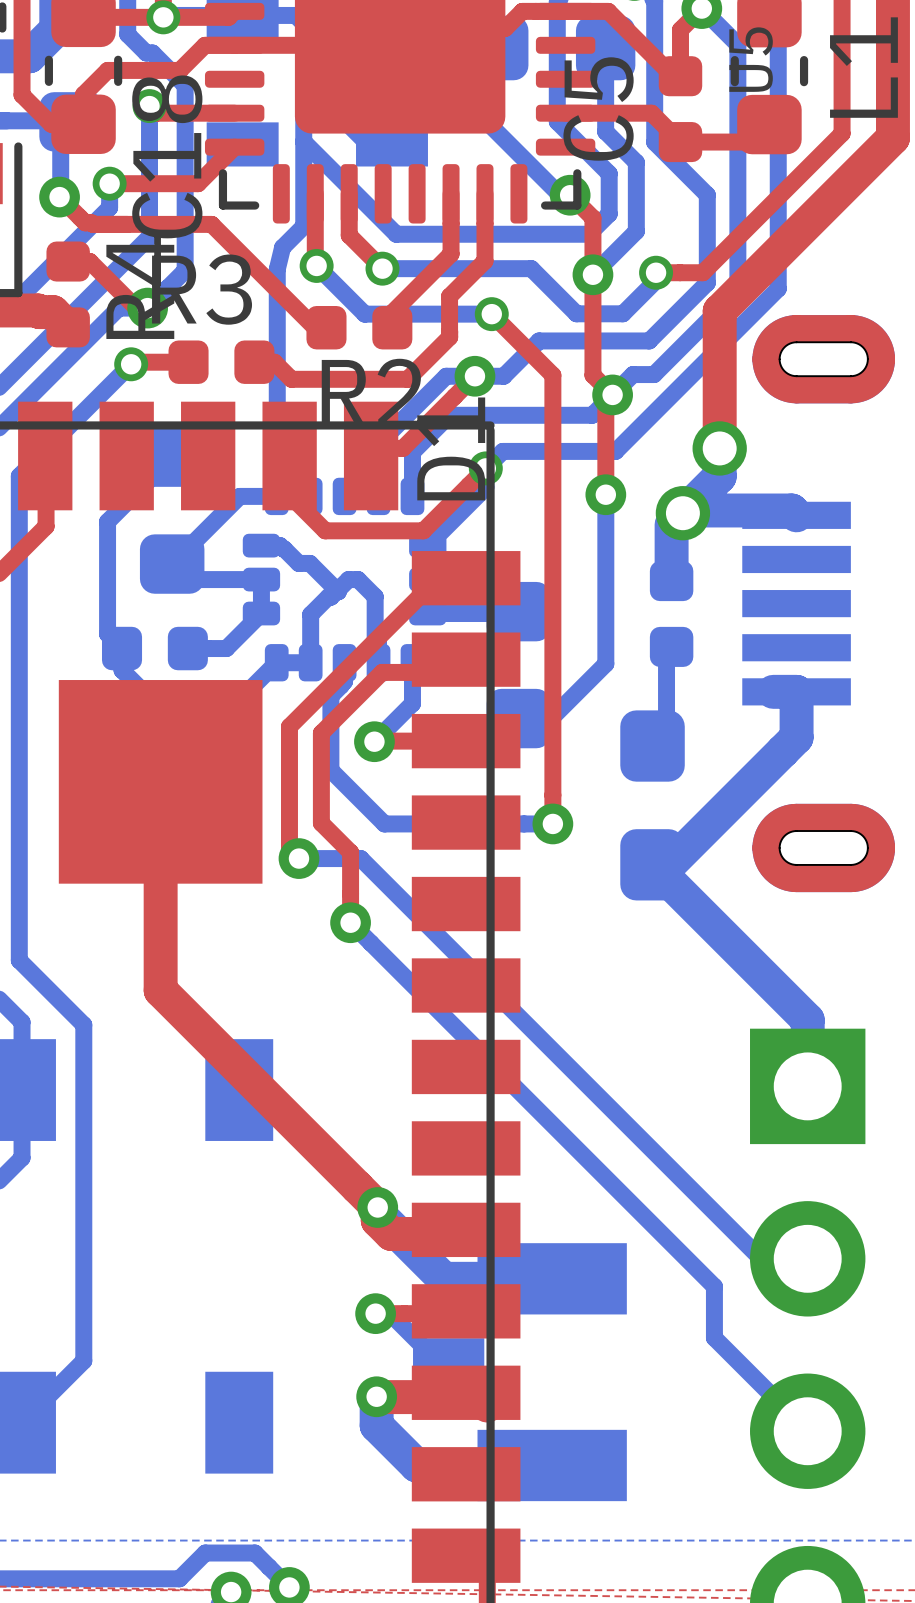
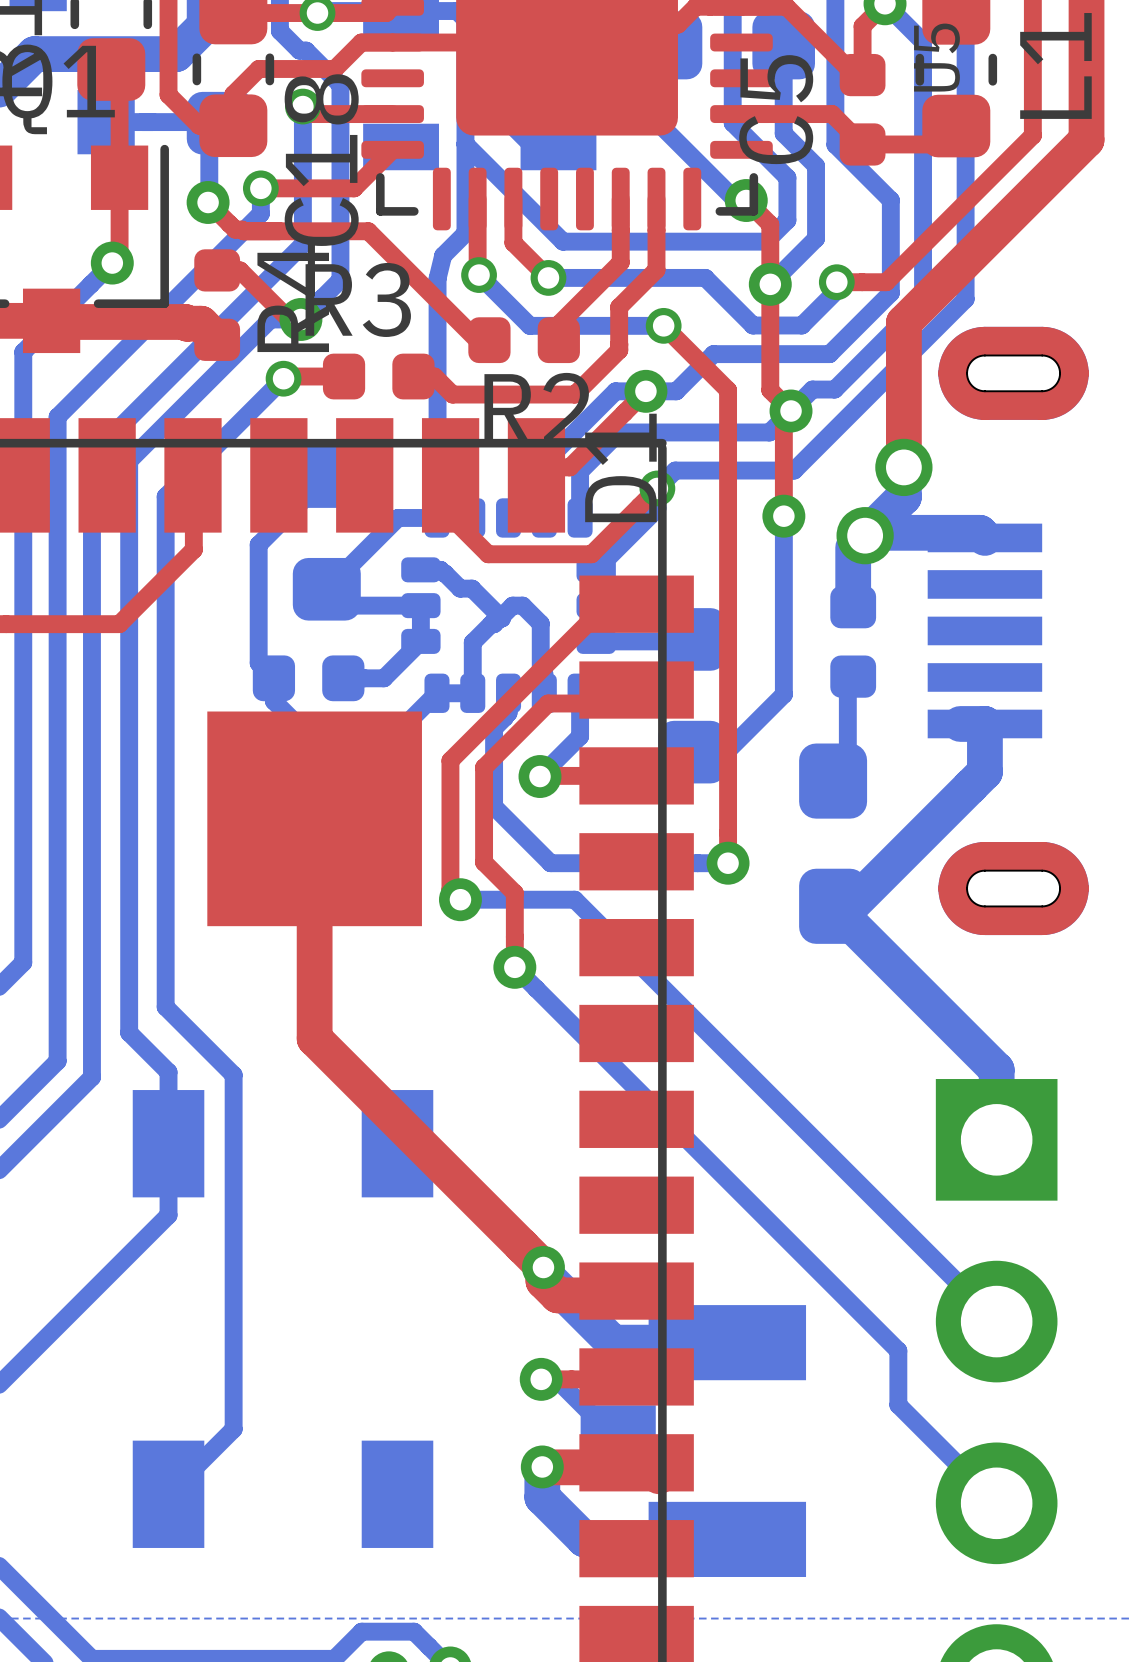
bottom track: (360, 858) (761, 1258) (807, 1258) -> (525, 899) (574, 899) (996, 1321)

